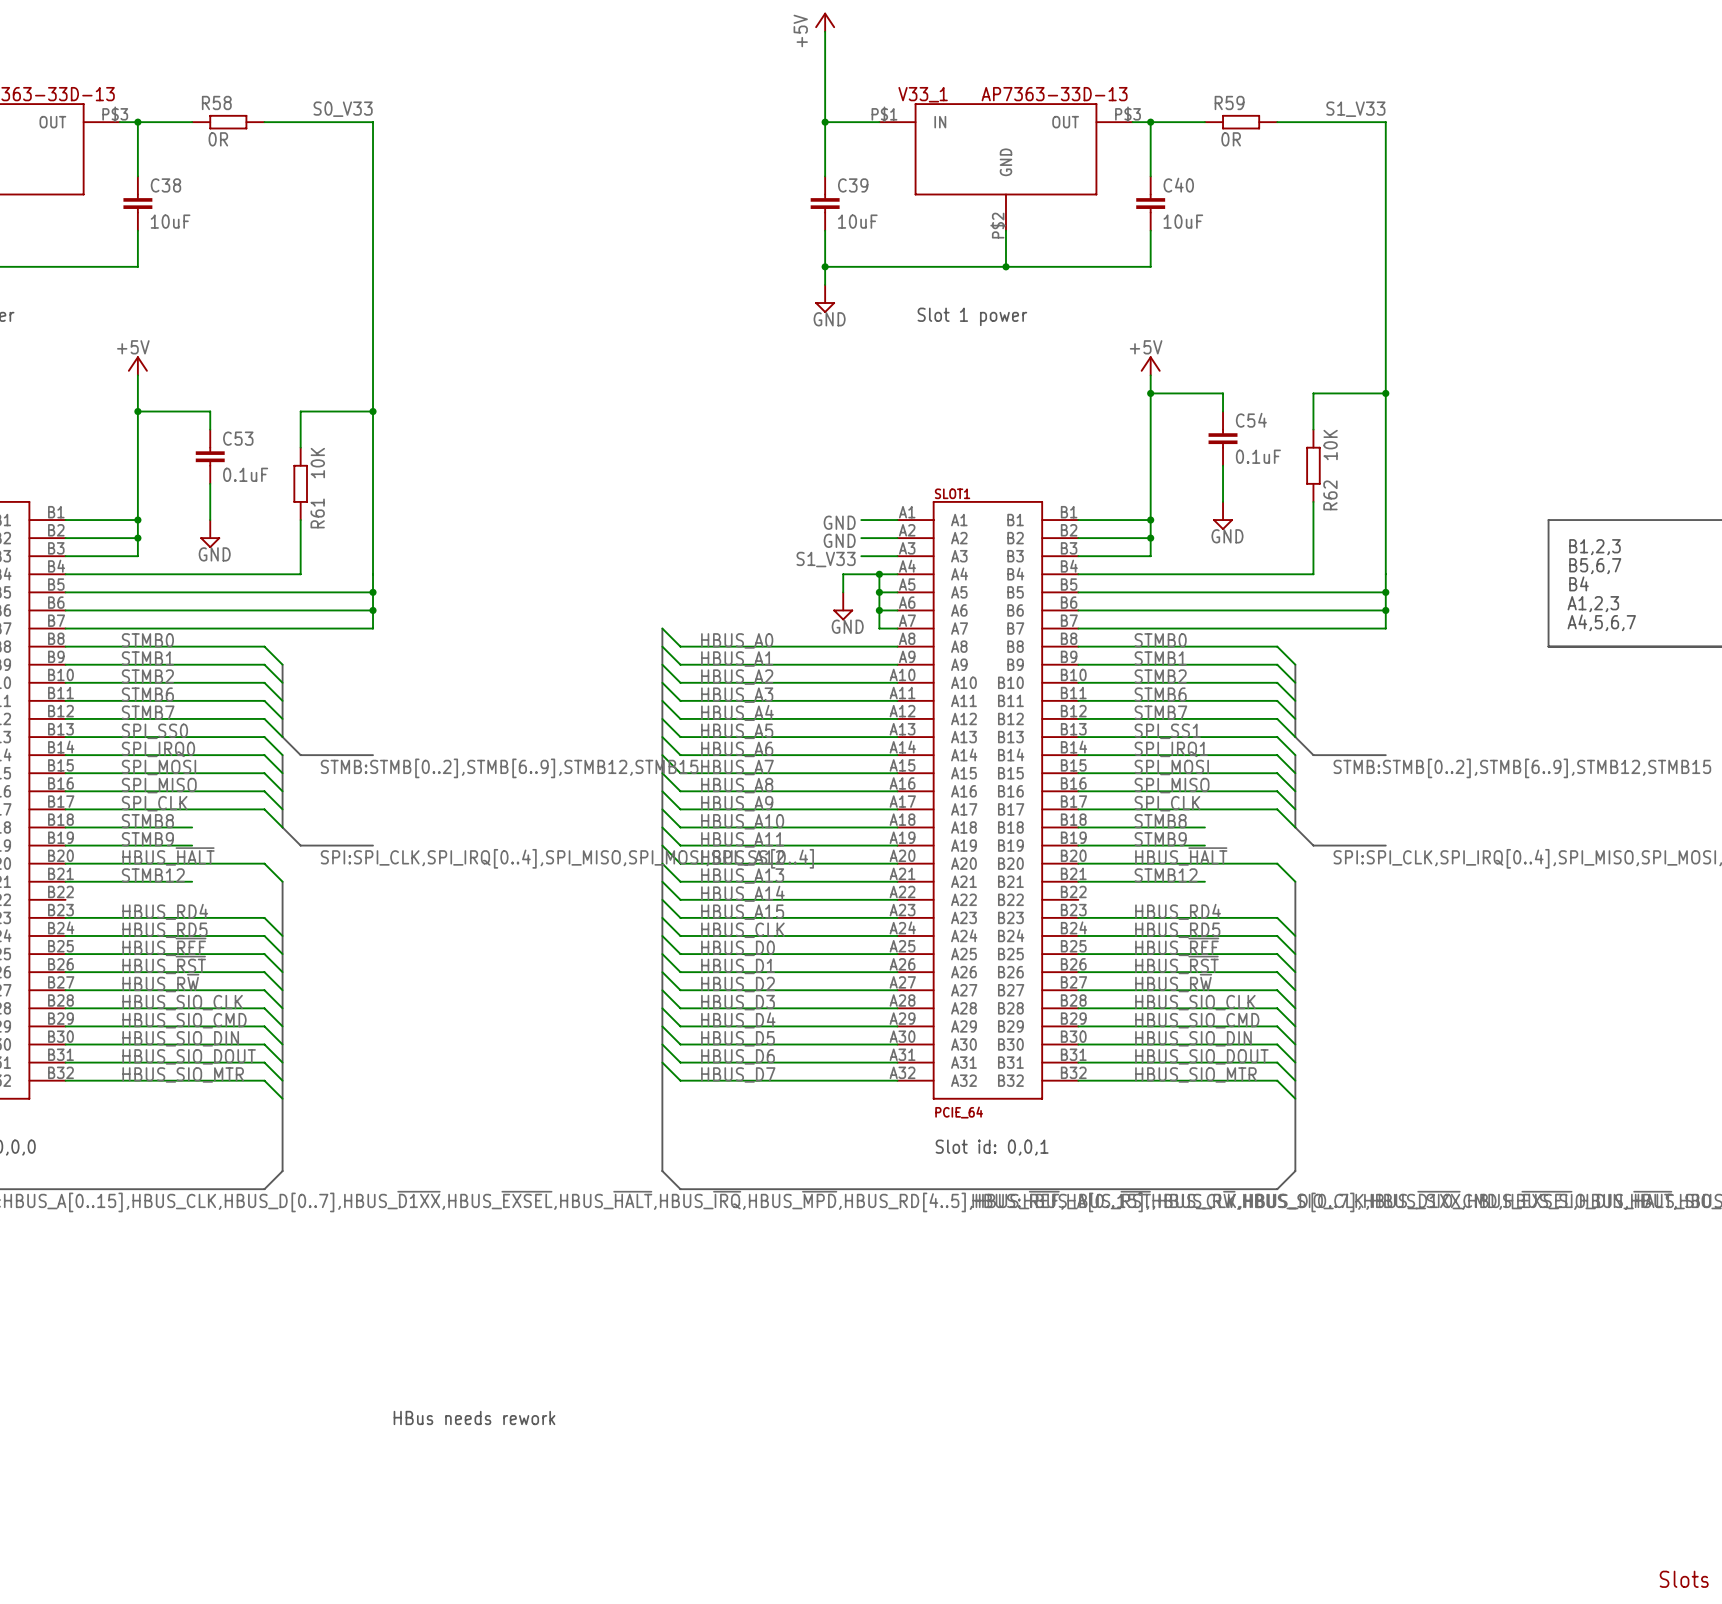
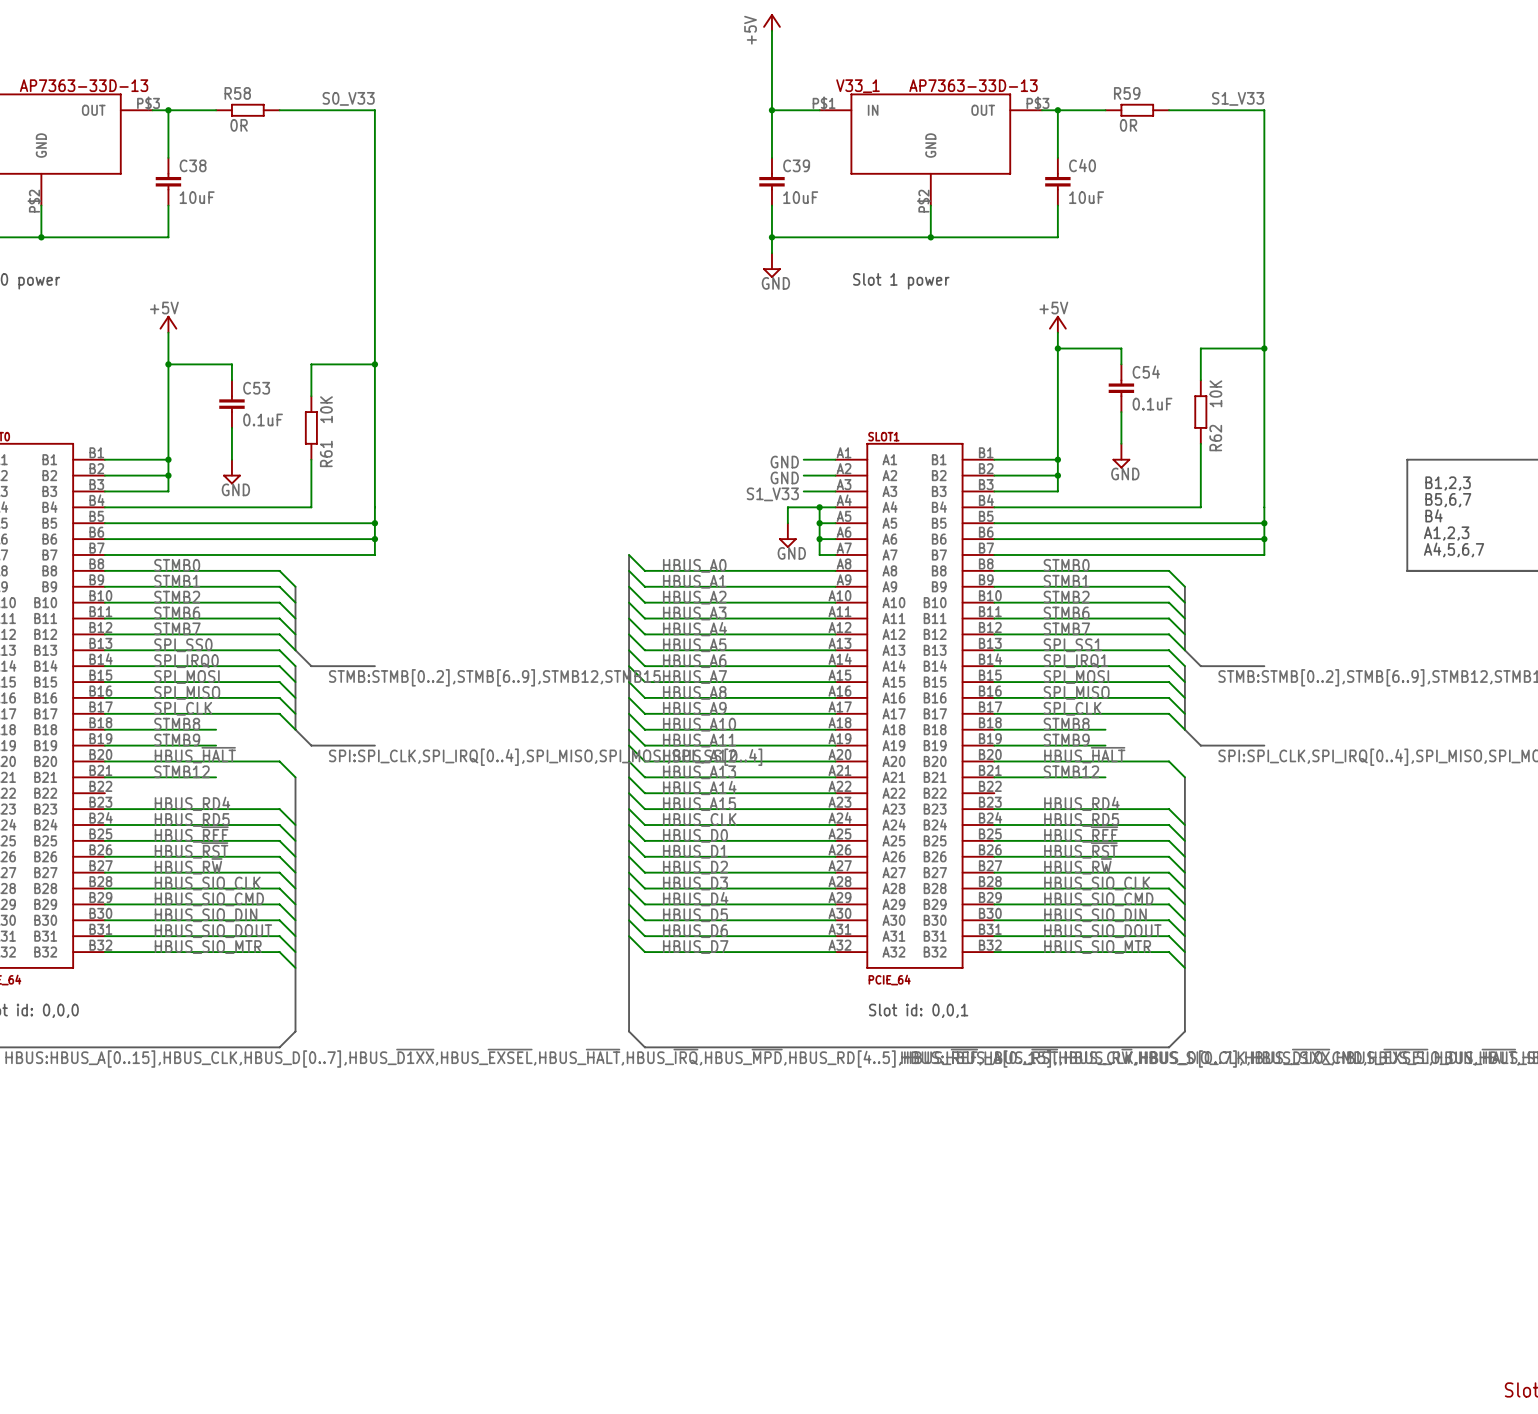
text: HBus needs rework (474, 1417) -> none

